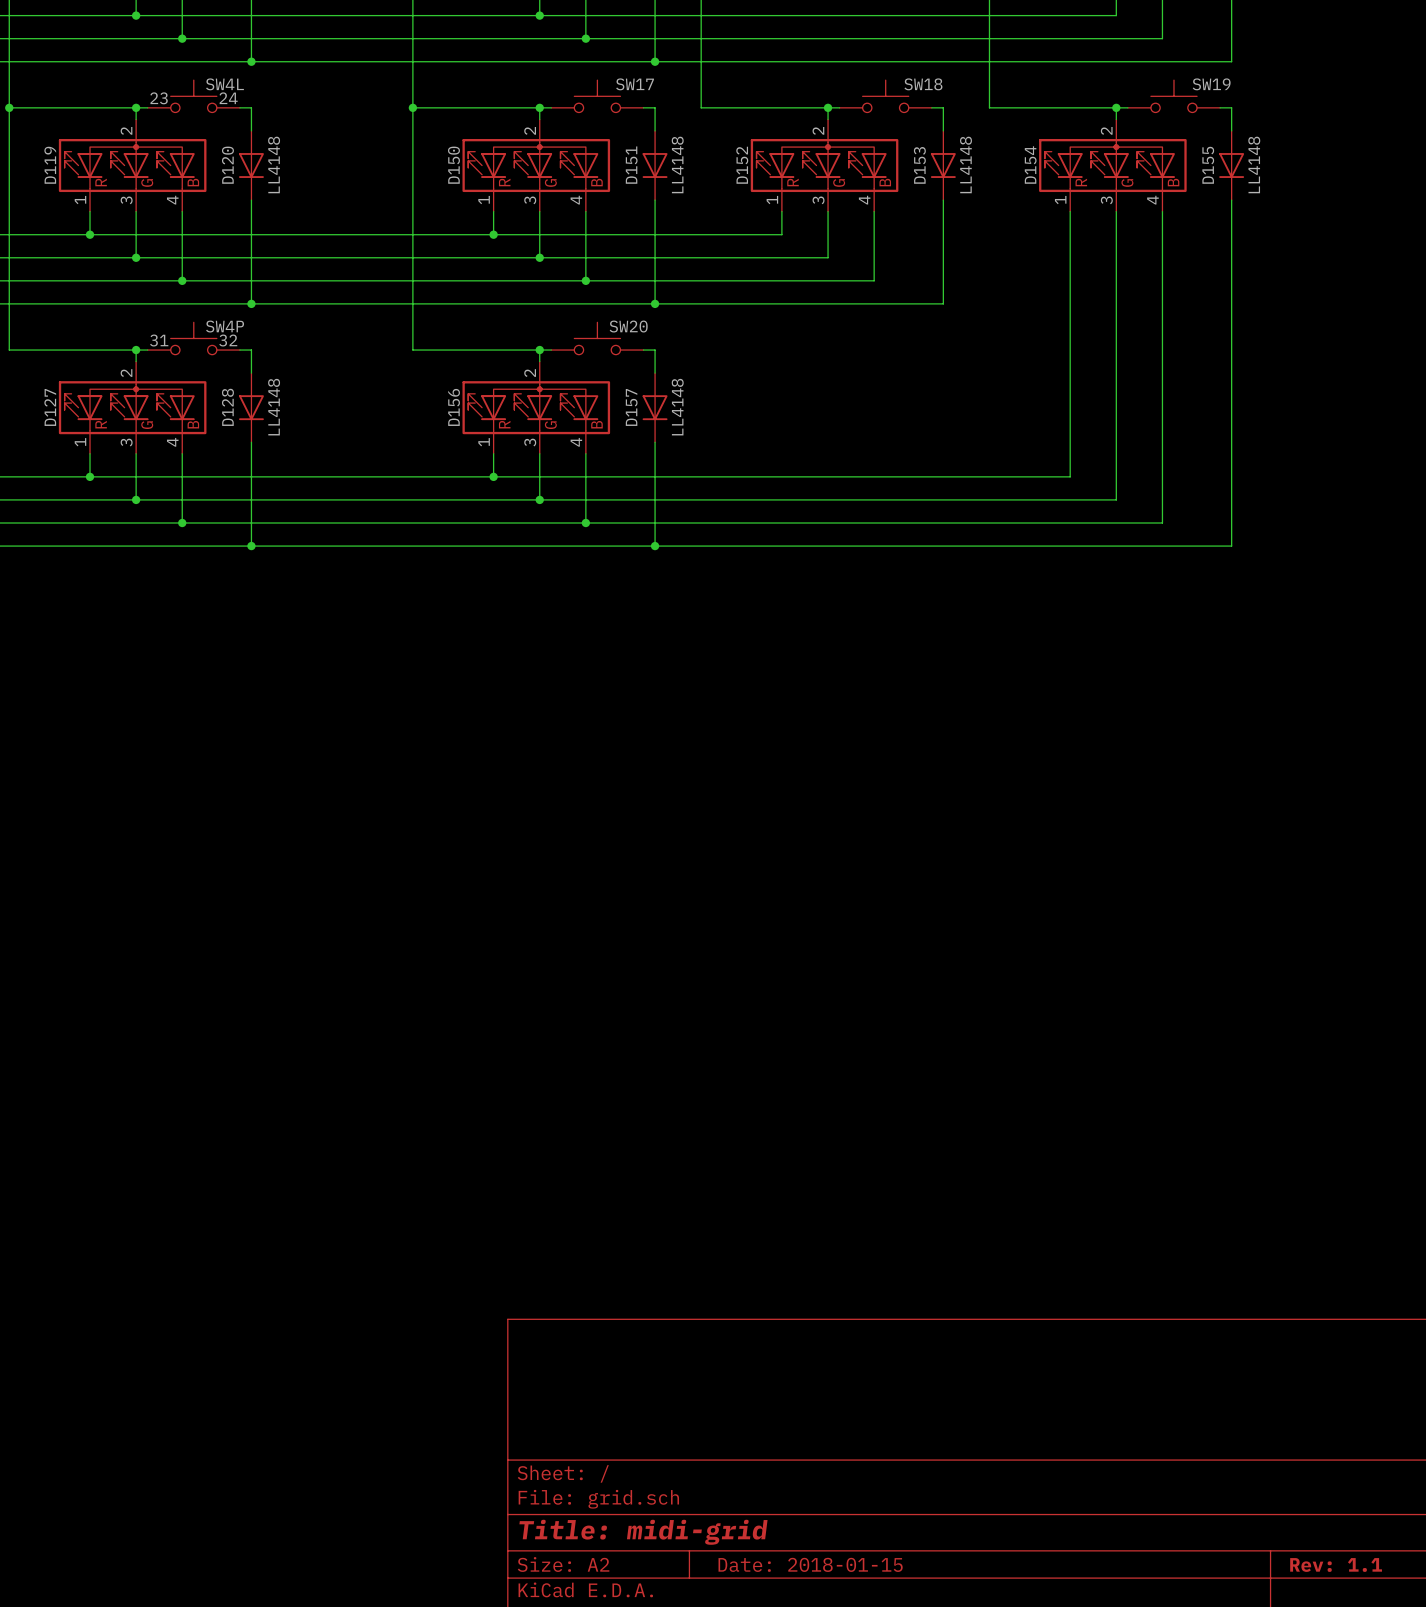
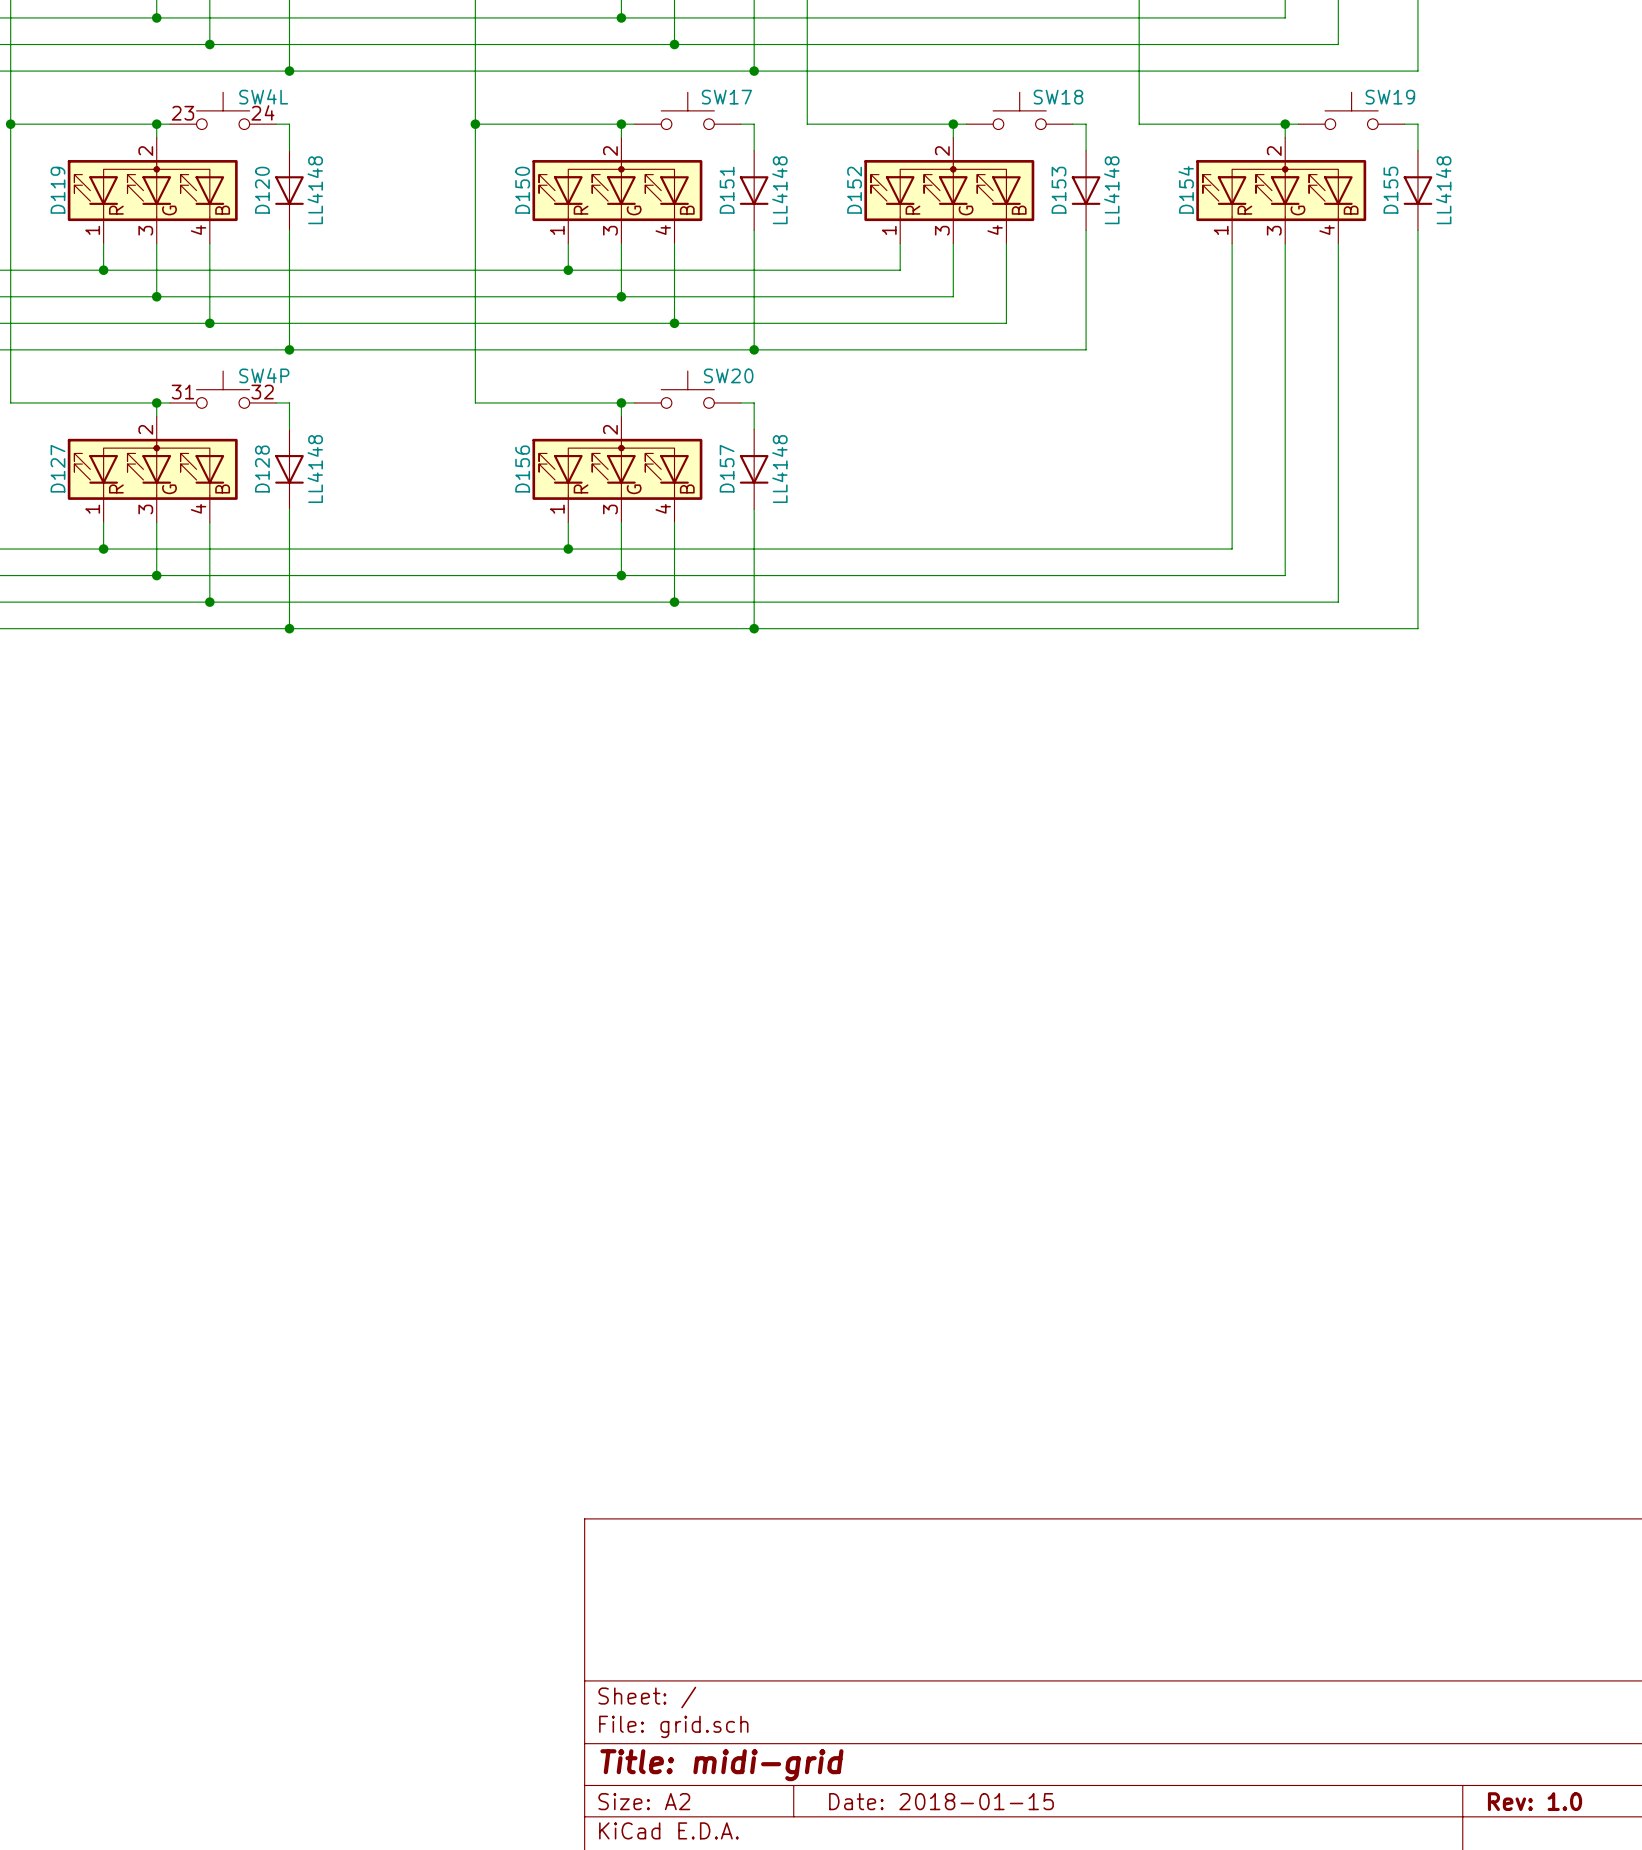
title block: Rev: 1.1 (1336, 1564) -> Rev: 1.0 (1535, 1801)

